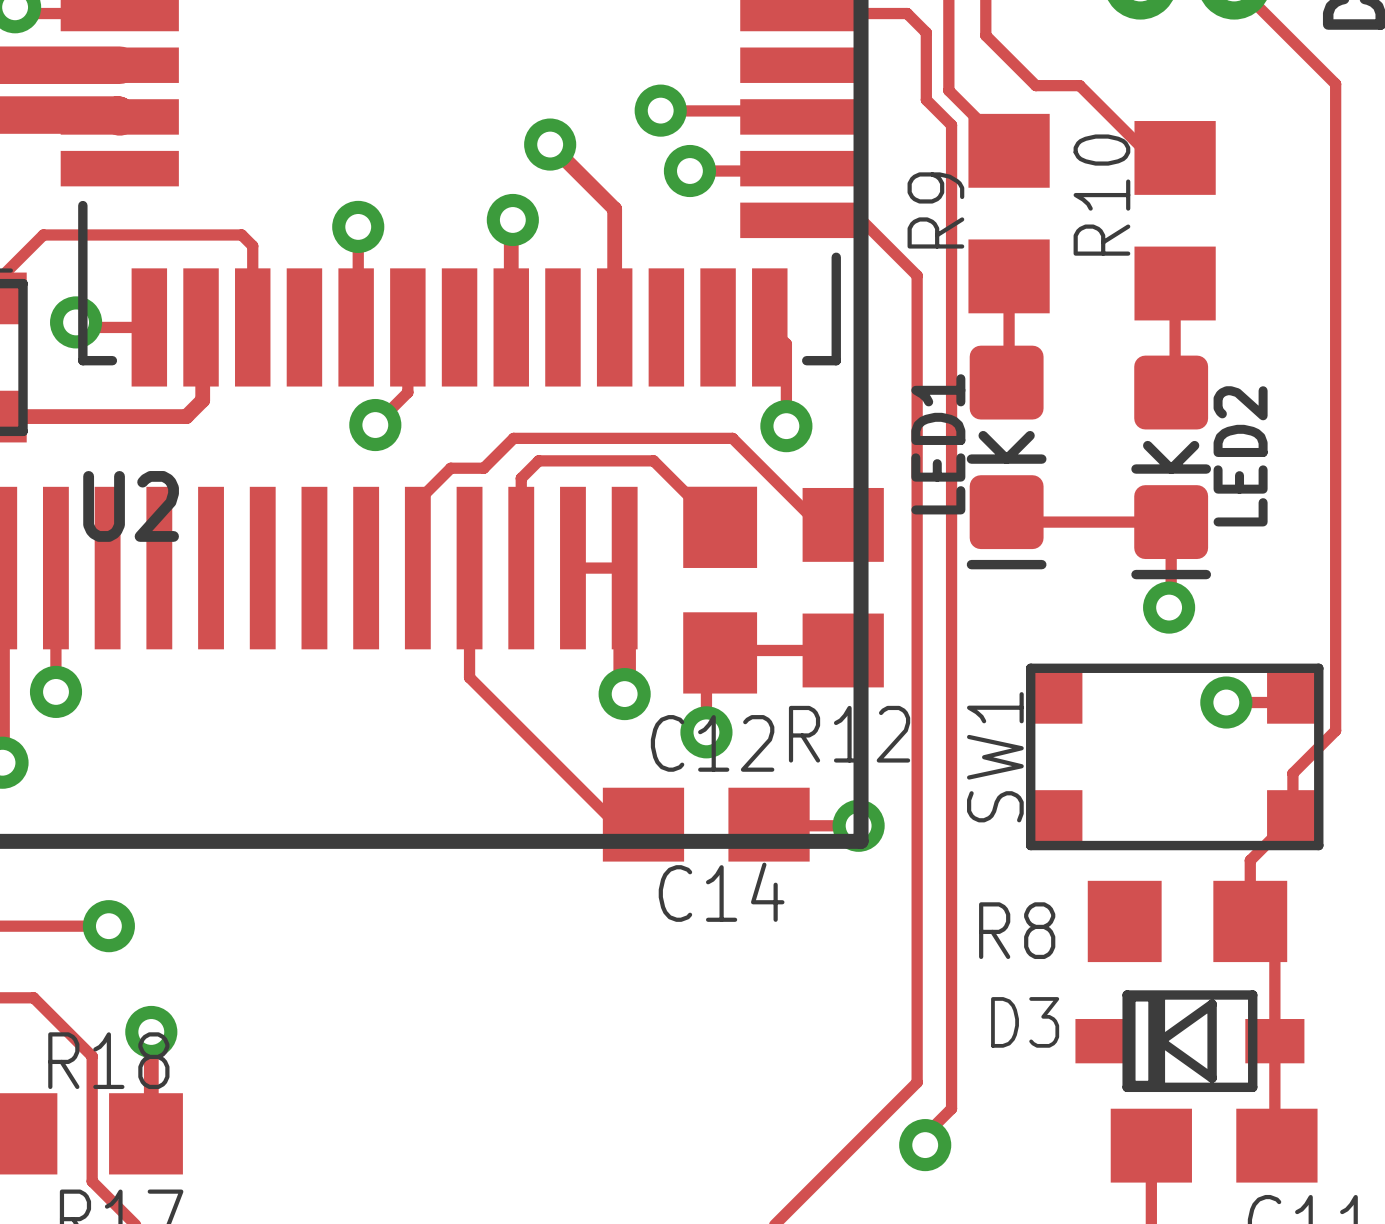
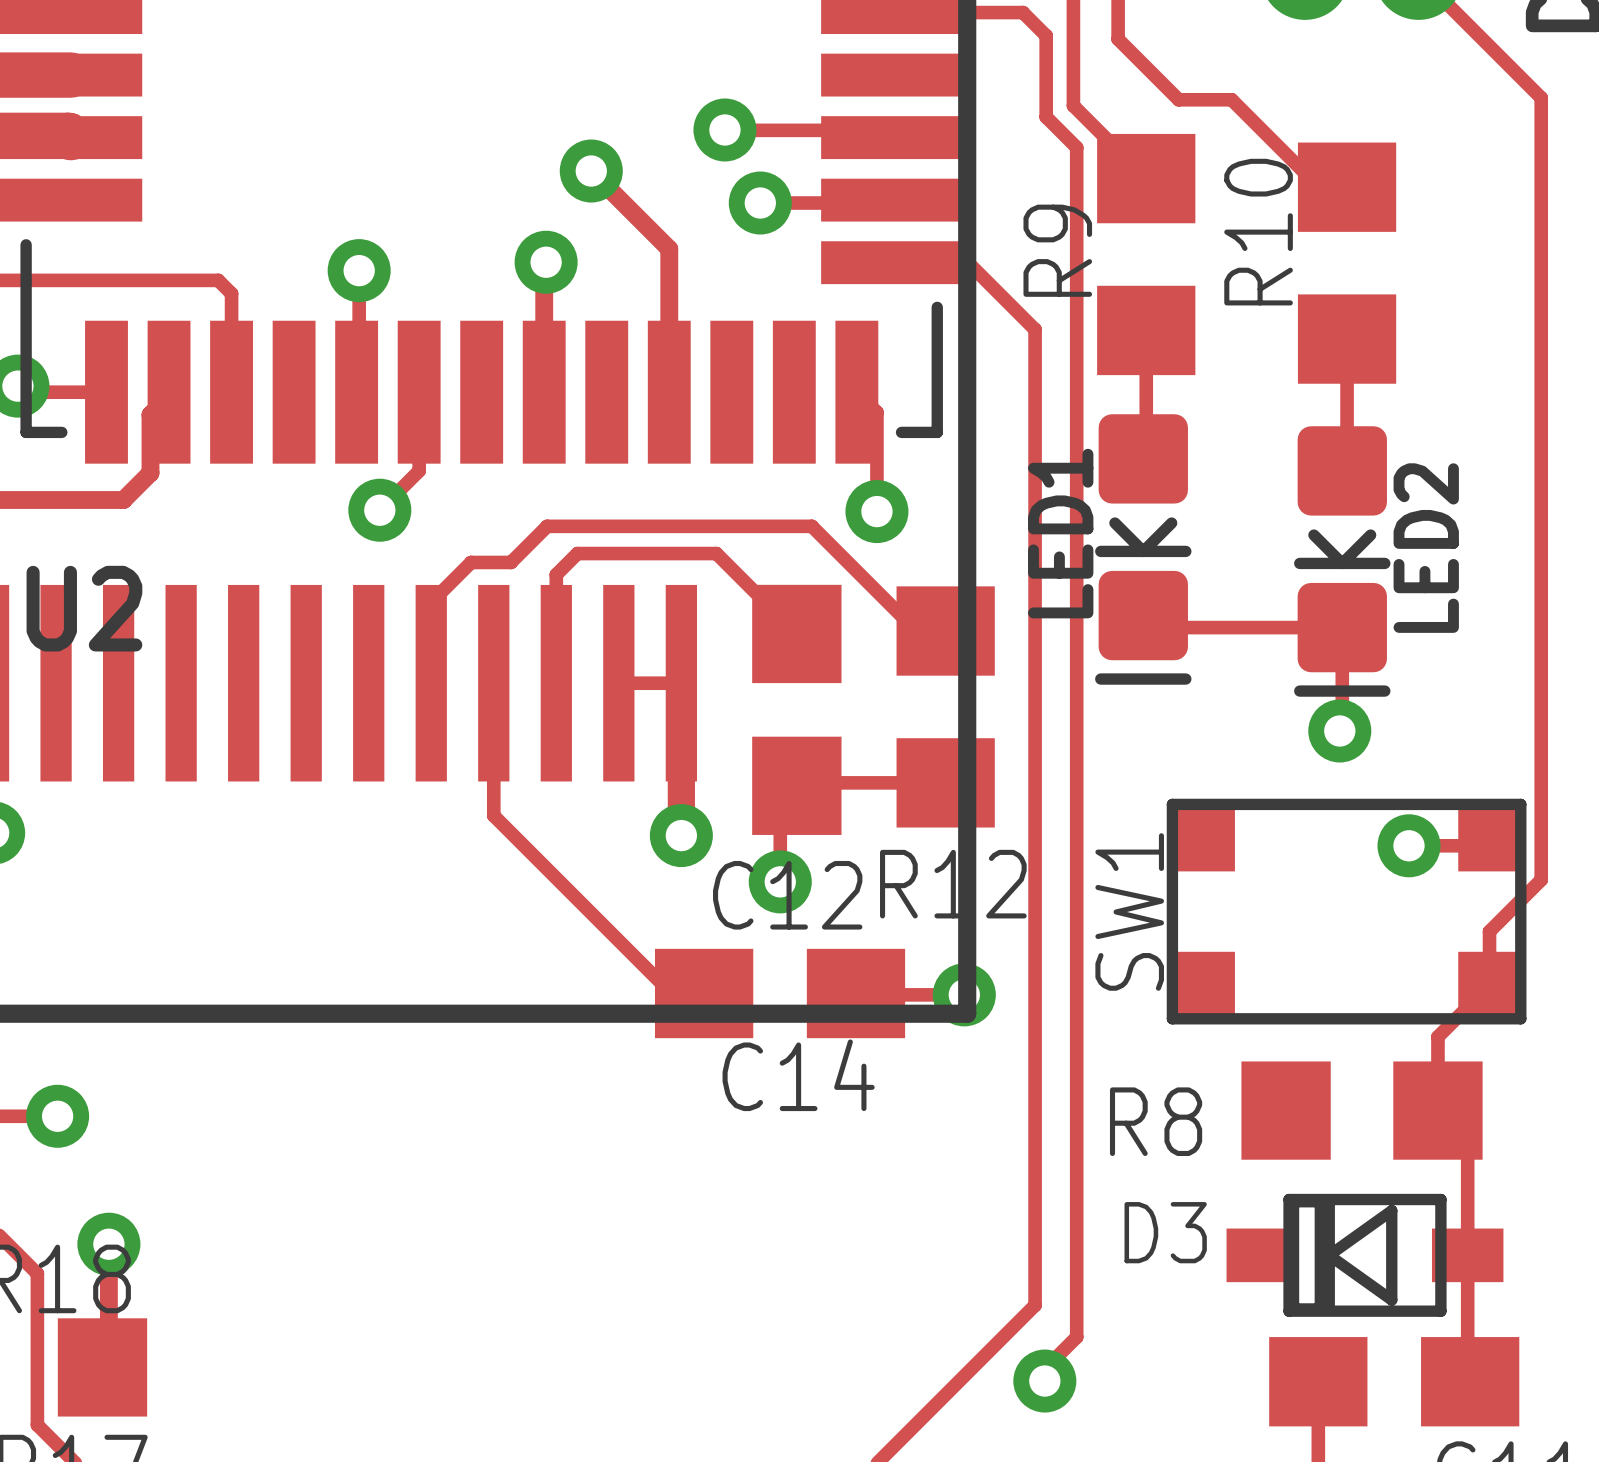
track: (202, 329) (202, 400) (186, 416) (163, 416) -> (171, 394) (150, 414) (150, 473) (123, 500)

